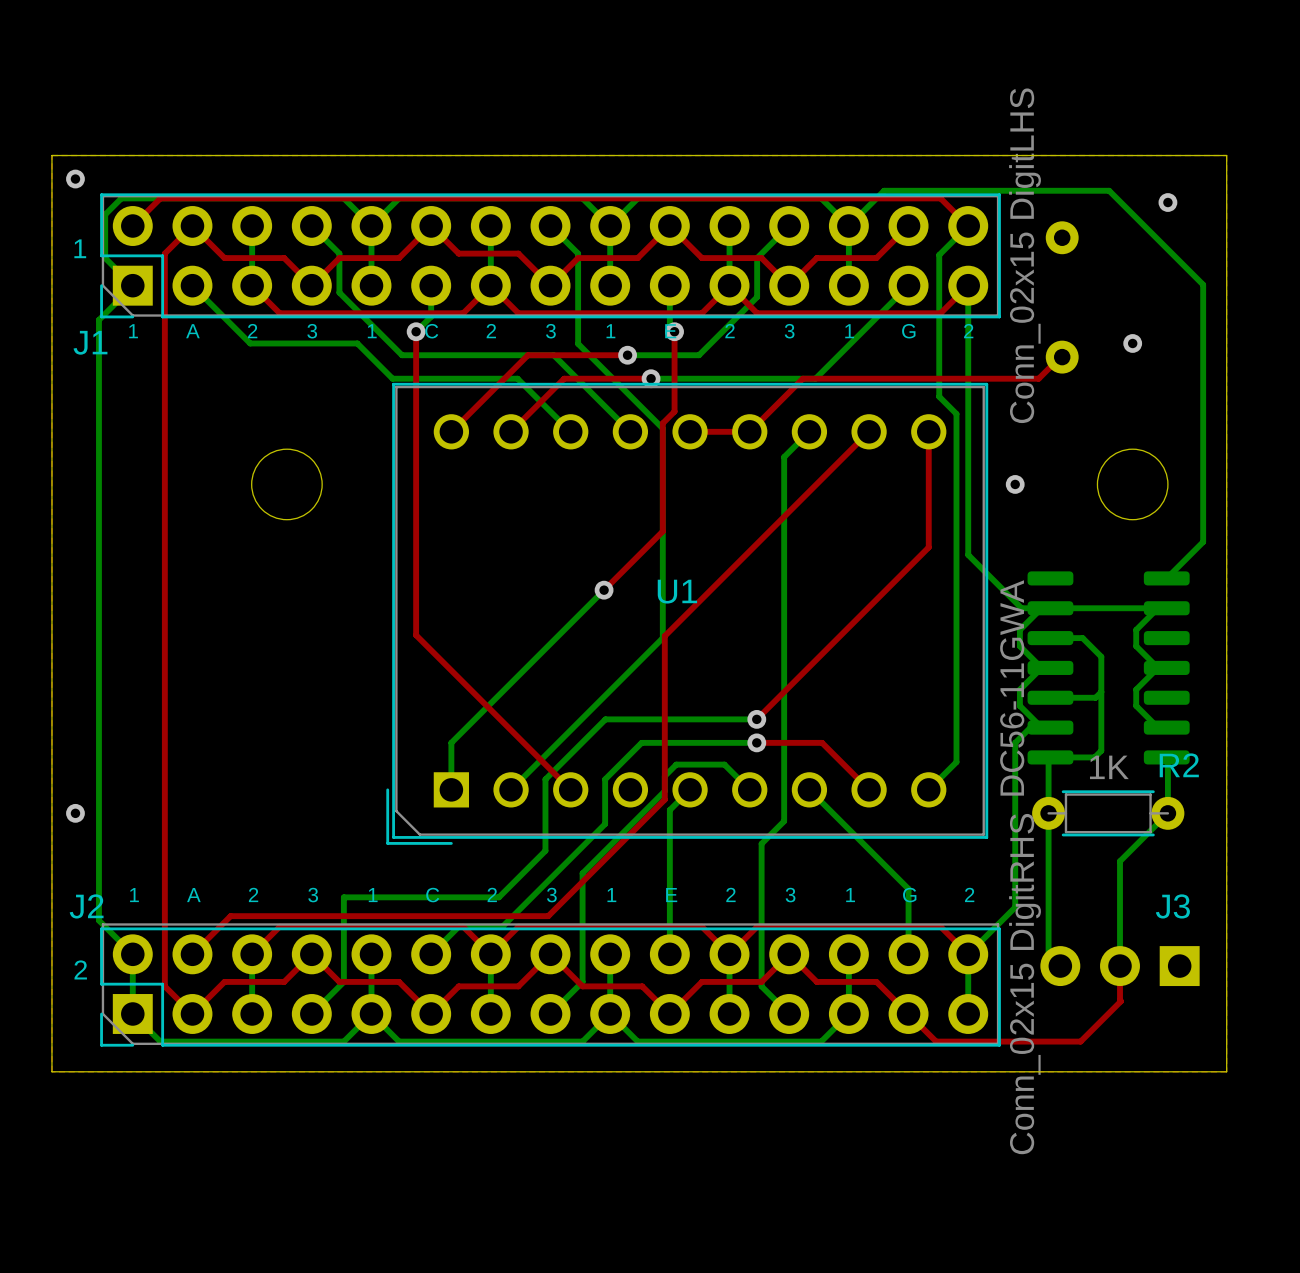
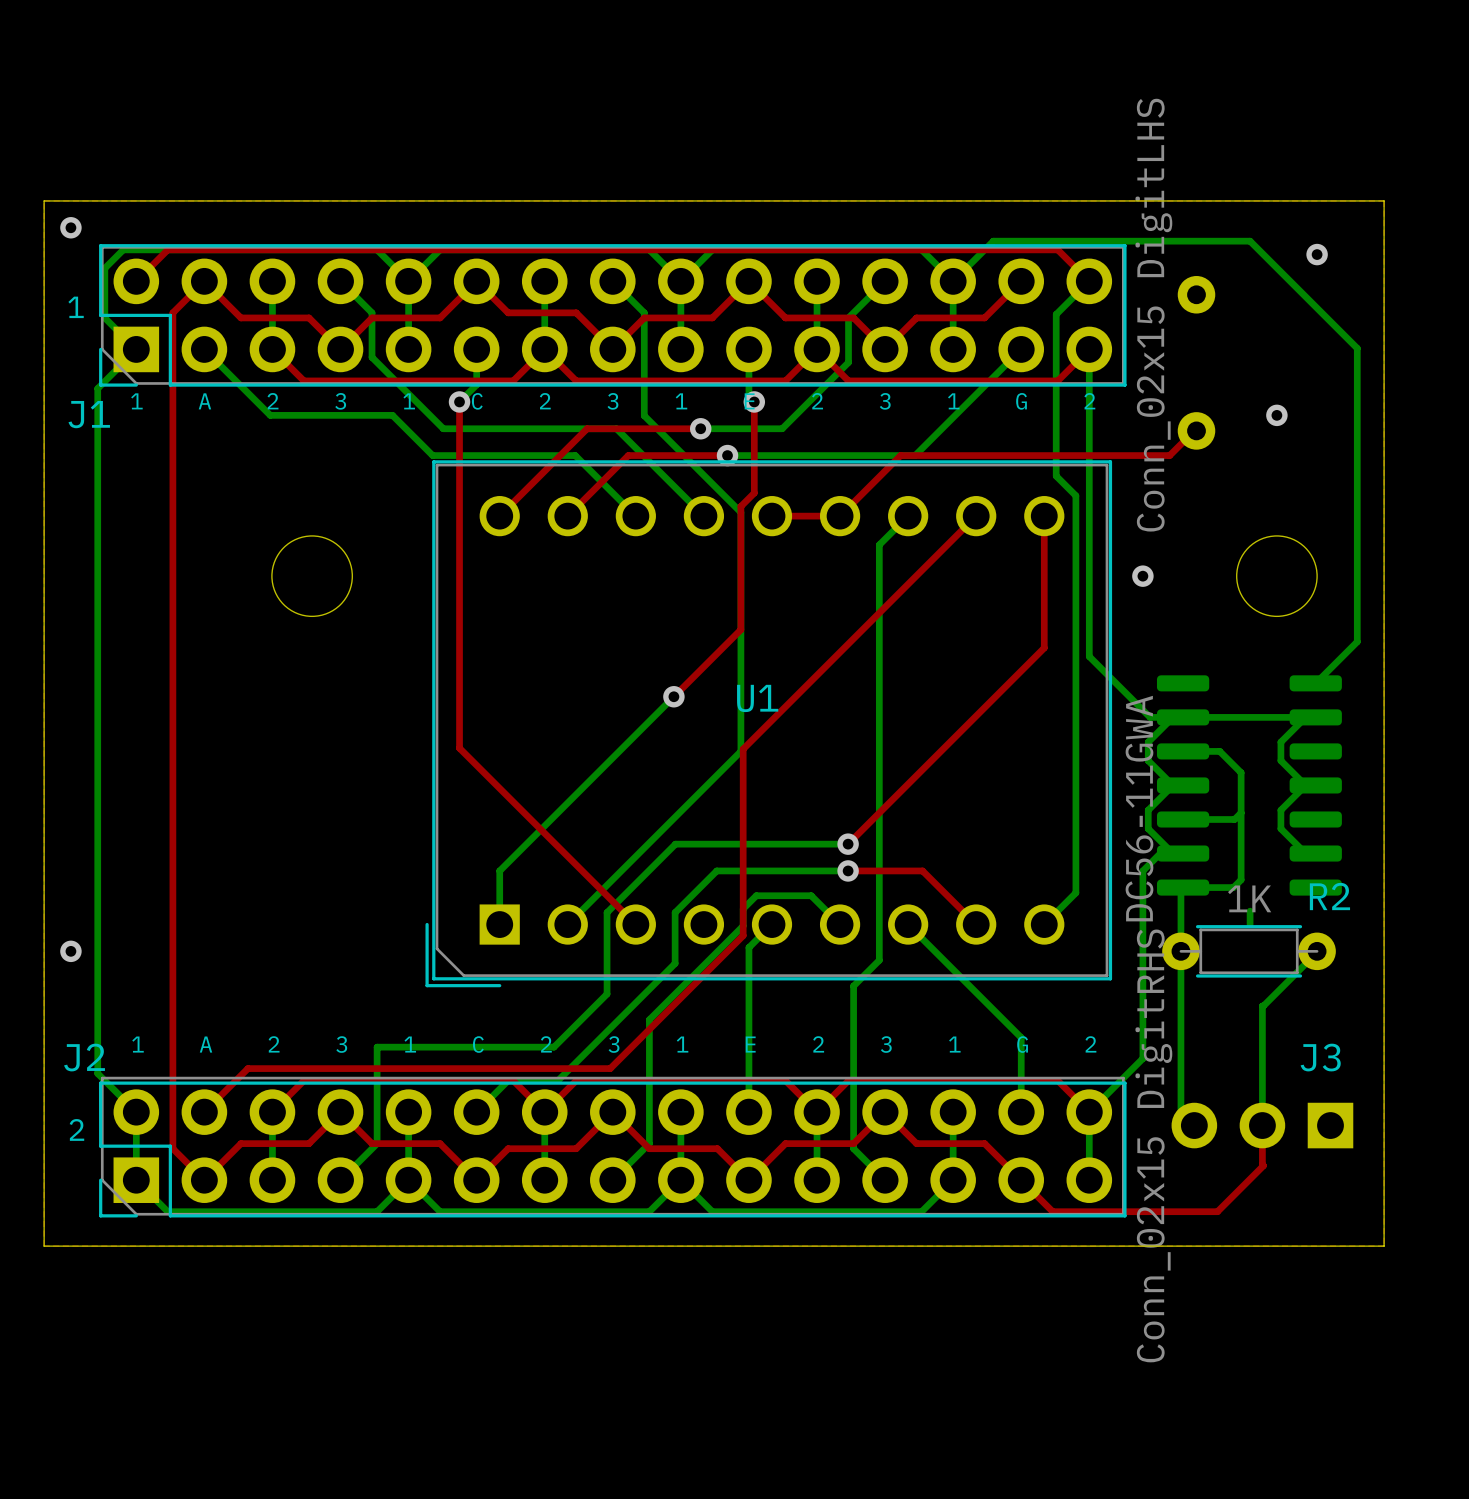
bottom track: (1167, 758) (1167, 813) (1120, 861) -> (1318, 951) (1262, 1006)
bottom track: none -> (1250, 911) (1250, 924)

